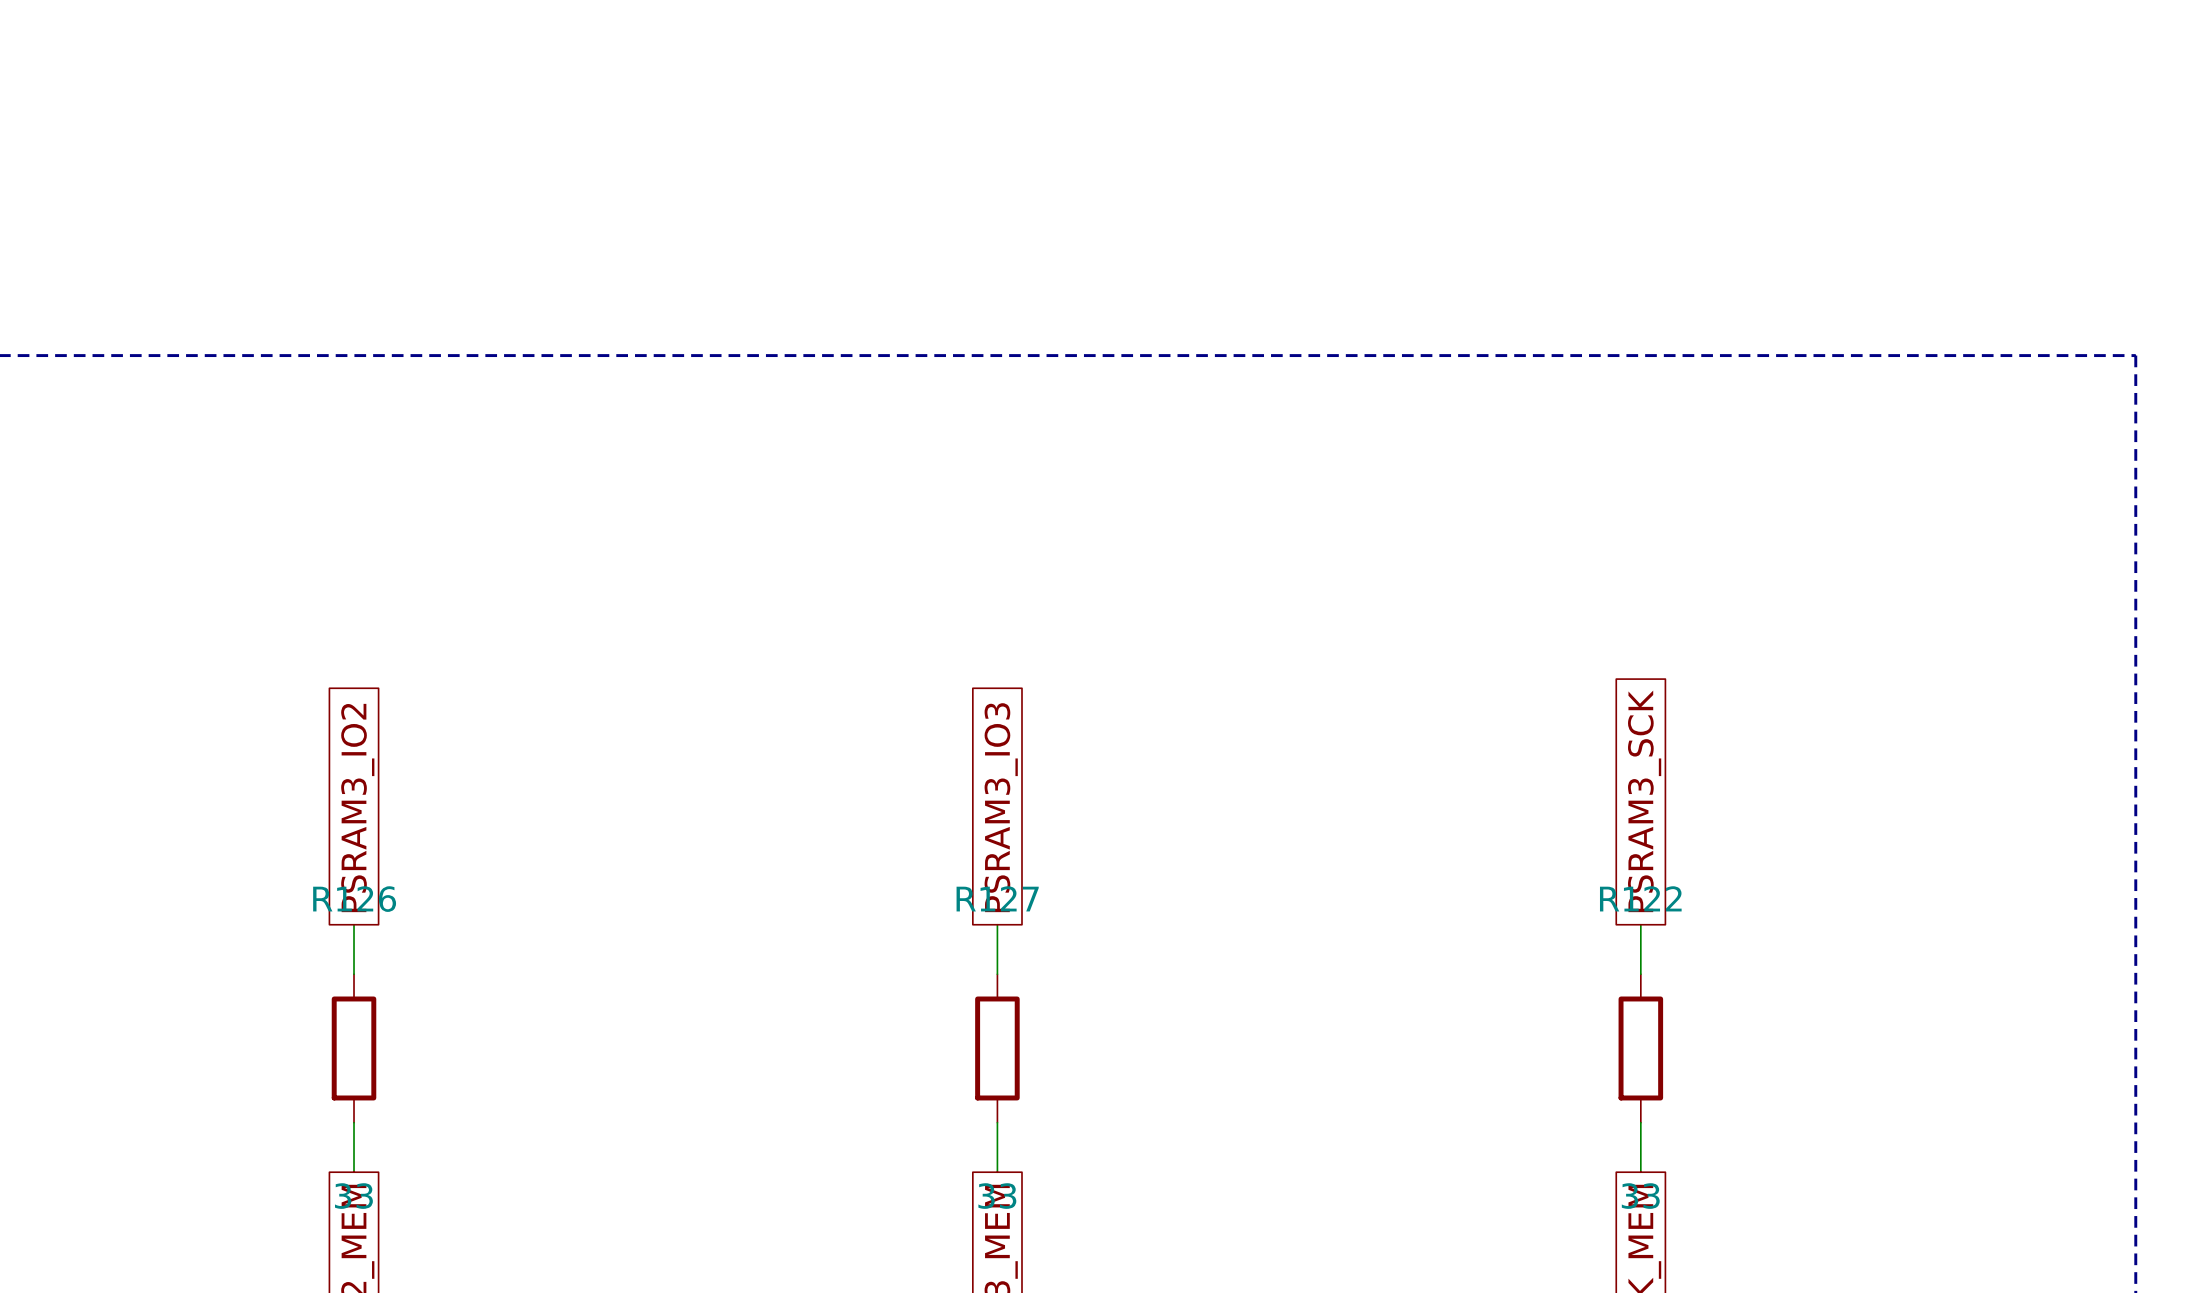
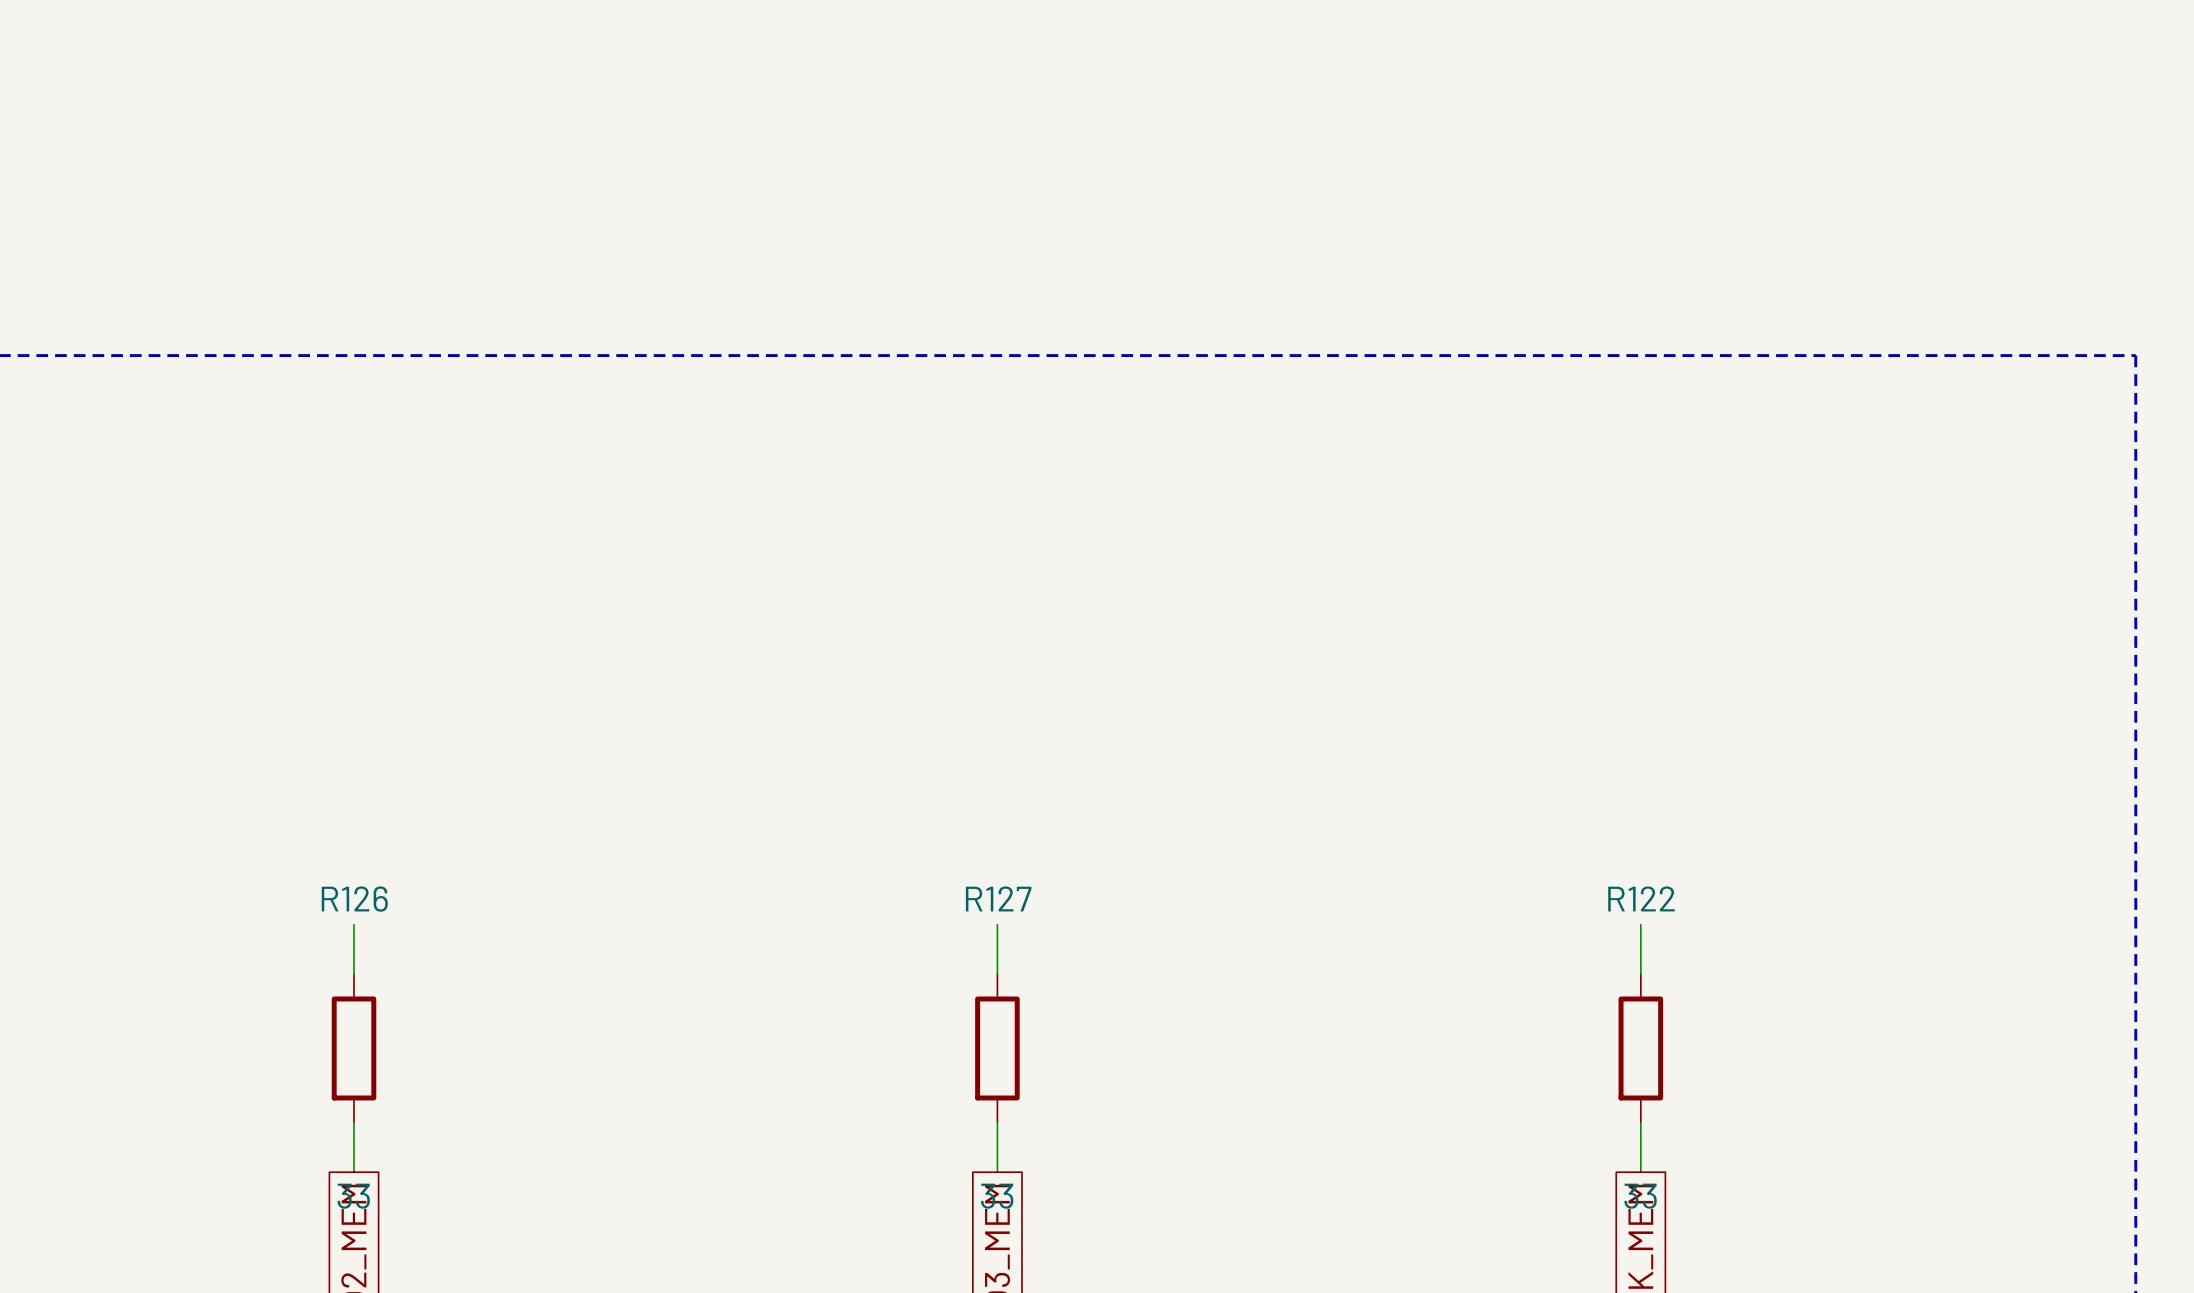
global label: PSRAM3_SCK (1644, 801) -> none
global label: PSRAM3_IO3 (1001, 807) -> none
global label: PSRAM3_IO2 (357, 808) -> none

